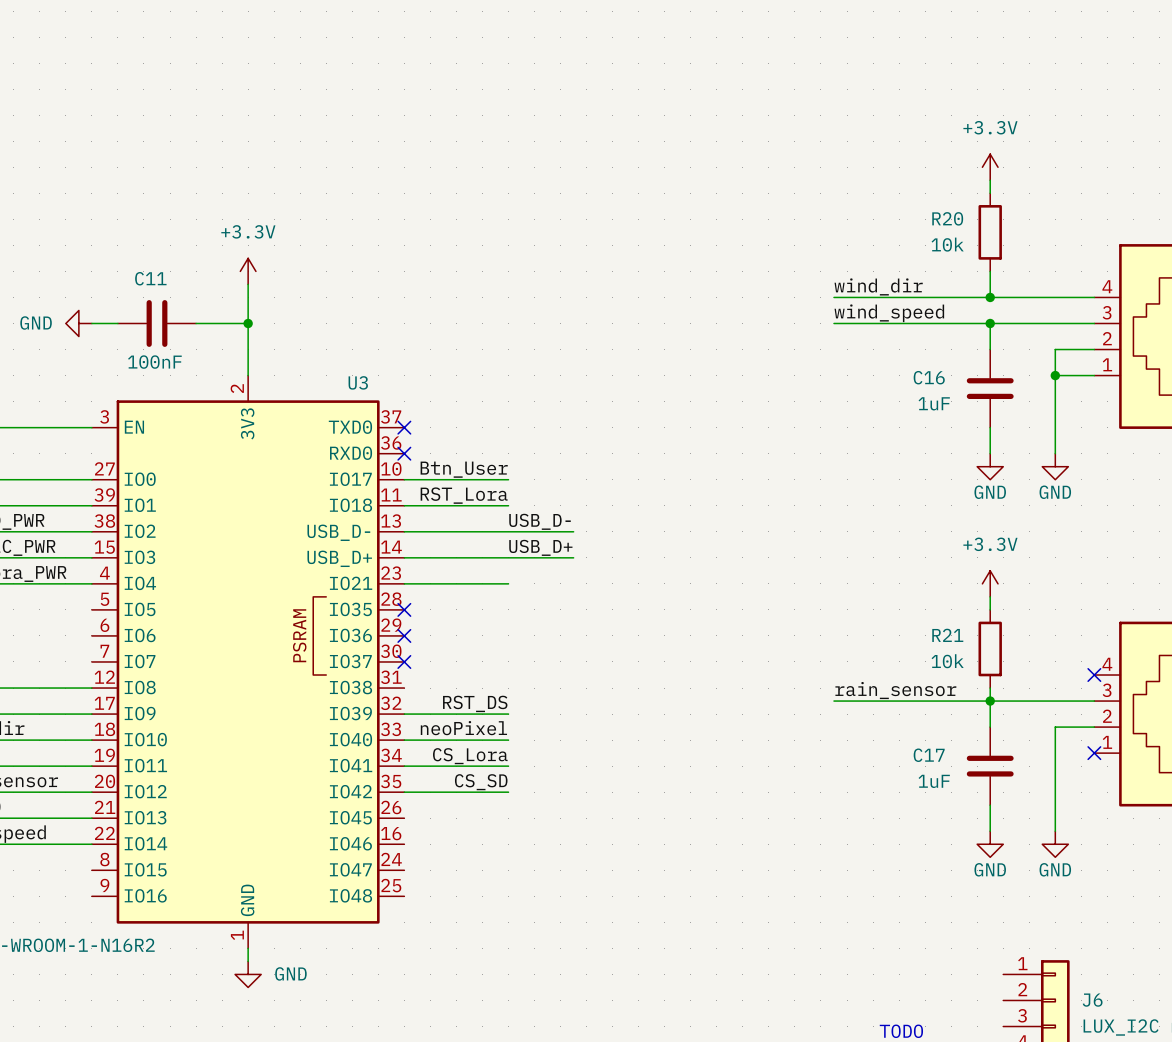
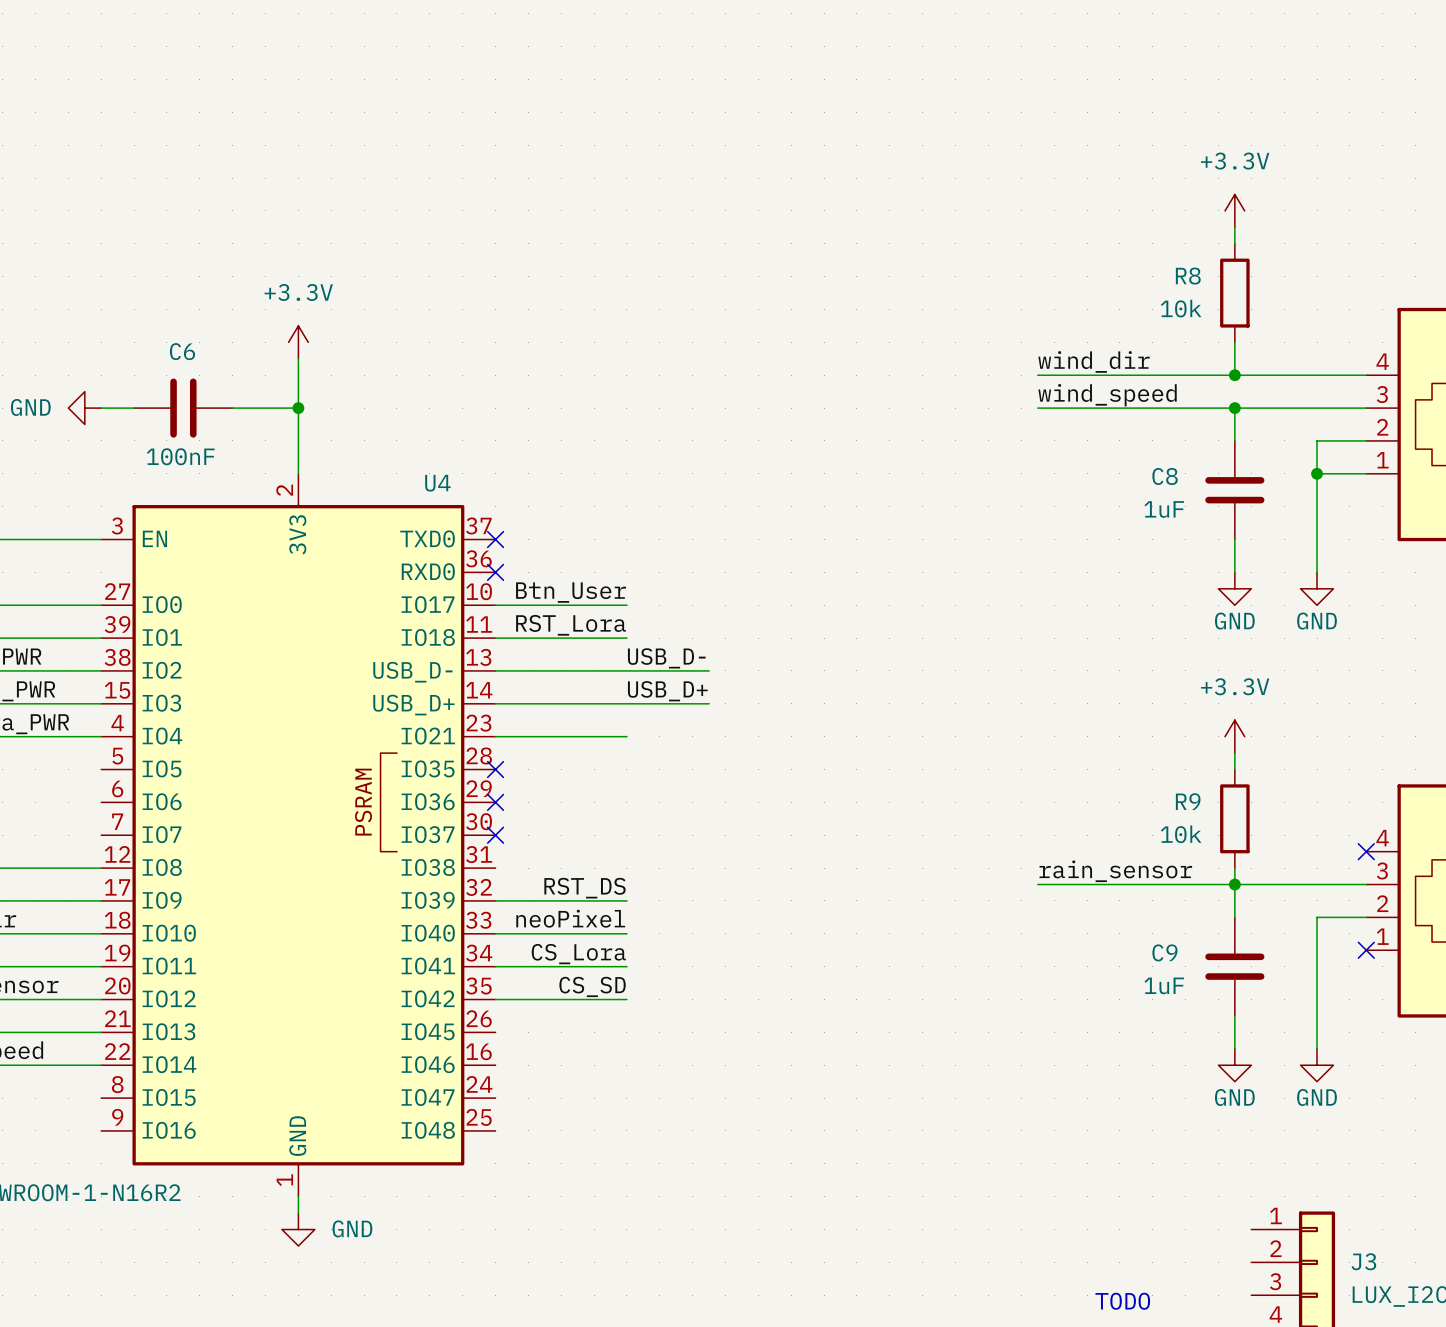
R20 name: R20 (947, 218) -> R8 (1188, 276)
C11 name: C11 (150, 278) -> C6 (182, 351)
C16 name: C16 (929, 377) -> C8 (1165, 476)
U3 name: U3 (358, 382) -> U4 (437, 483)
R21 name: R21 (947, 635) -> R9 (1188, 801)
C17 name: C17 (929, 755) -> C9 (1164, 952)
J6 name: J6 (1092, 1000) -> J3 (1363, 1261)

